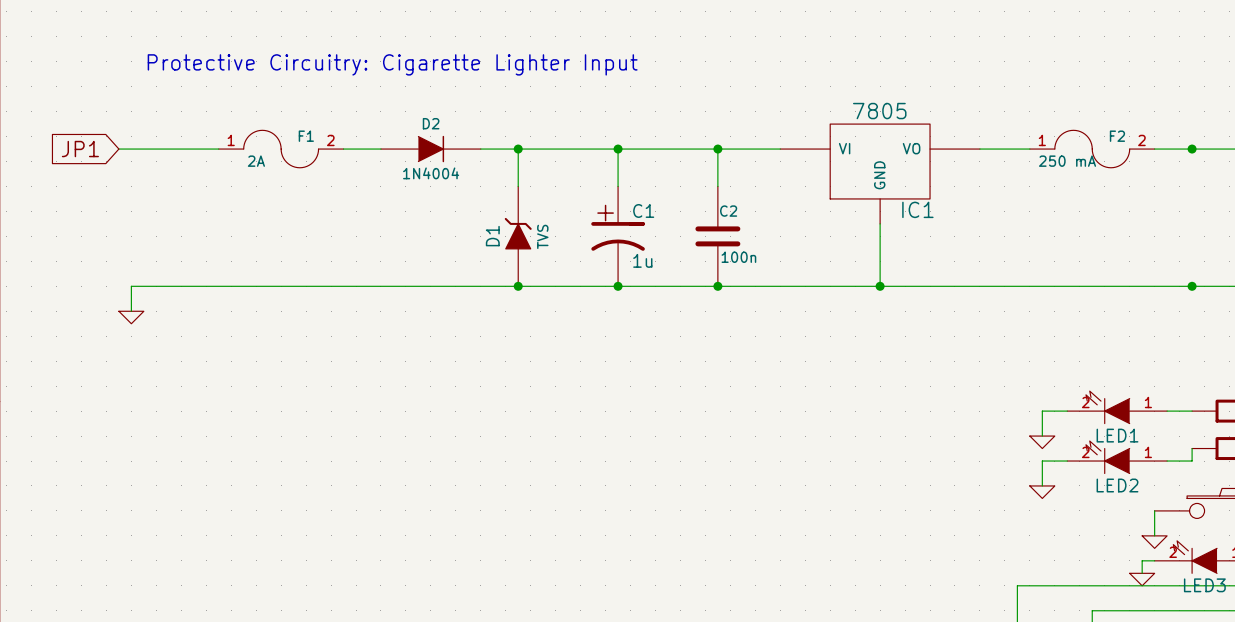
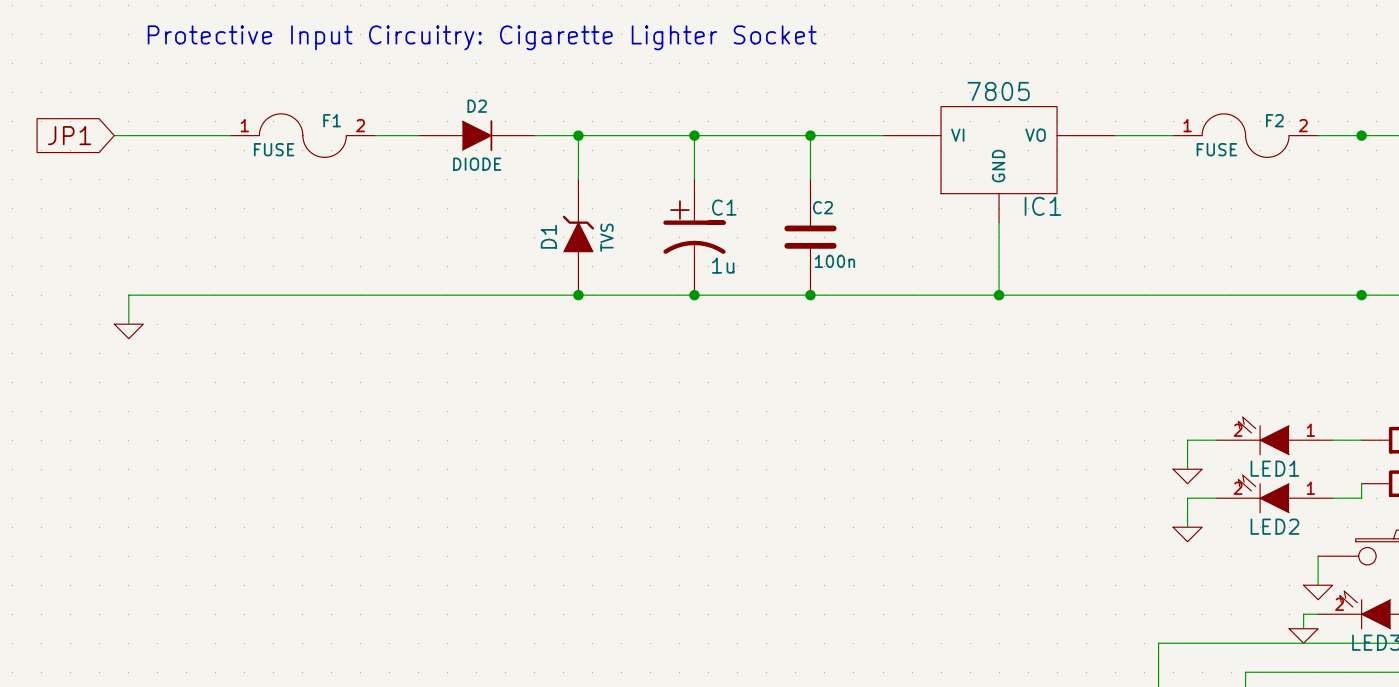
text: Protective Circuitry: Cigarette Lighter Input (392, 64) -> Protective Input Circuitry: Cigarette Lighter Socket (482, 37)
F1 value: 2A (256, 161) -> FUSE (274, 149)
F2 value: 250 mA (1067, 161) -> FUSE (1216, 149)
D2 value: 1N4004 (431, 173) -> DIODE (477, 164)

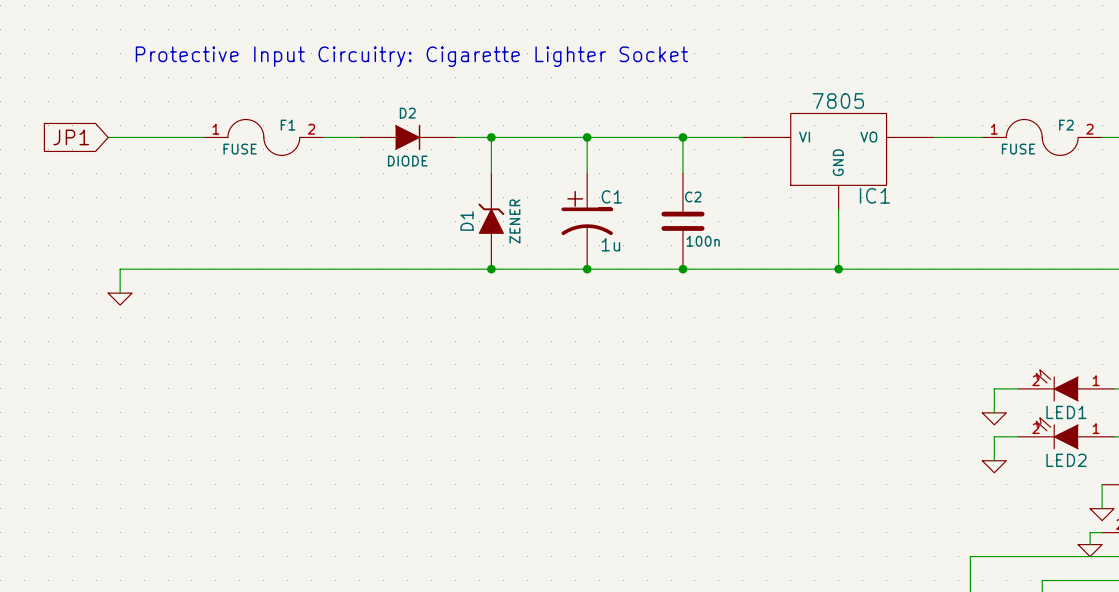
D1 value: TVS (607, 237) -> ZENER (514, 221)

